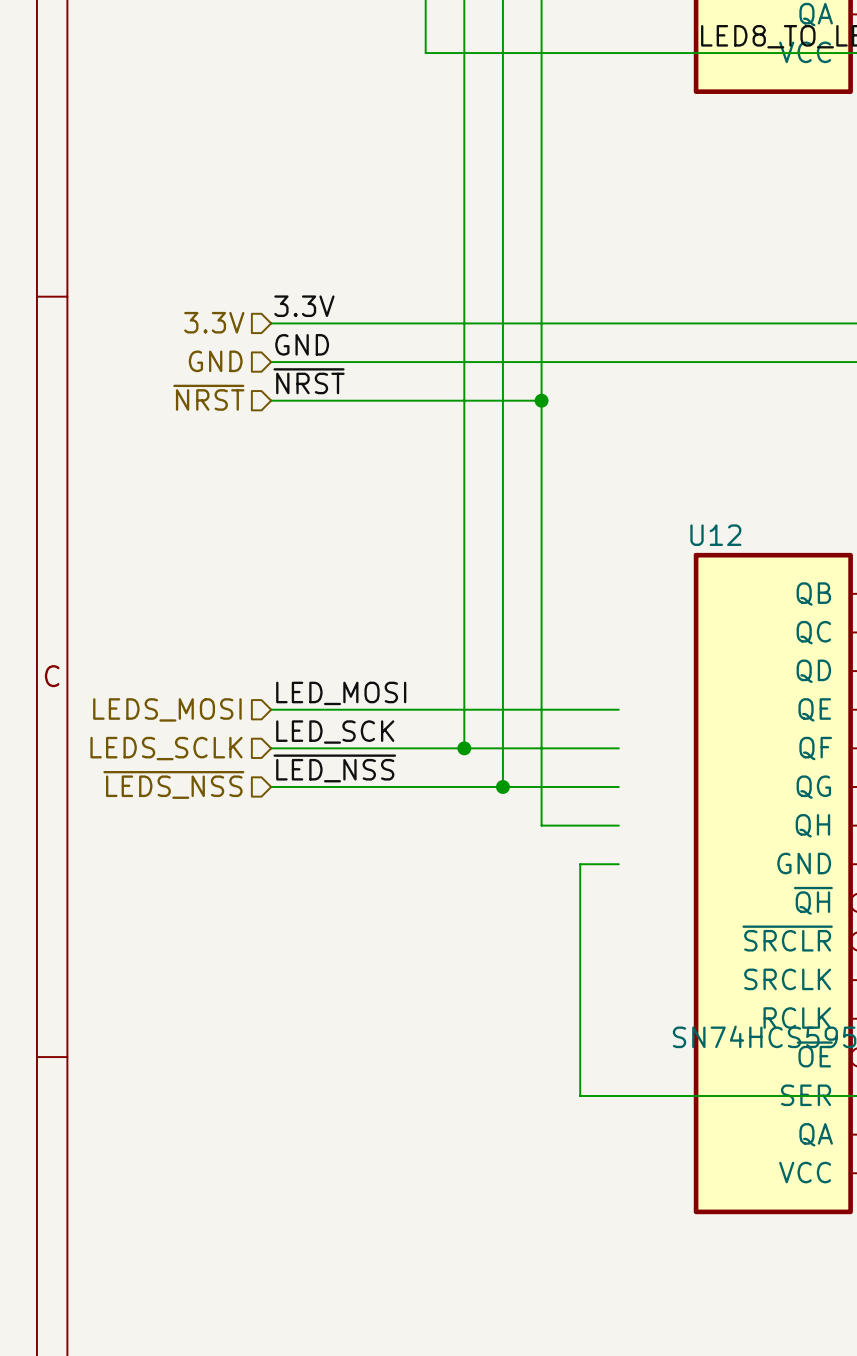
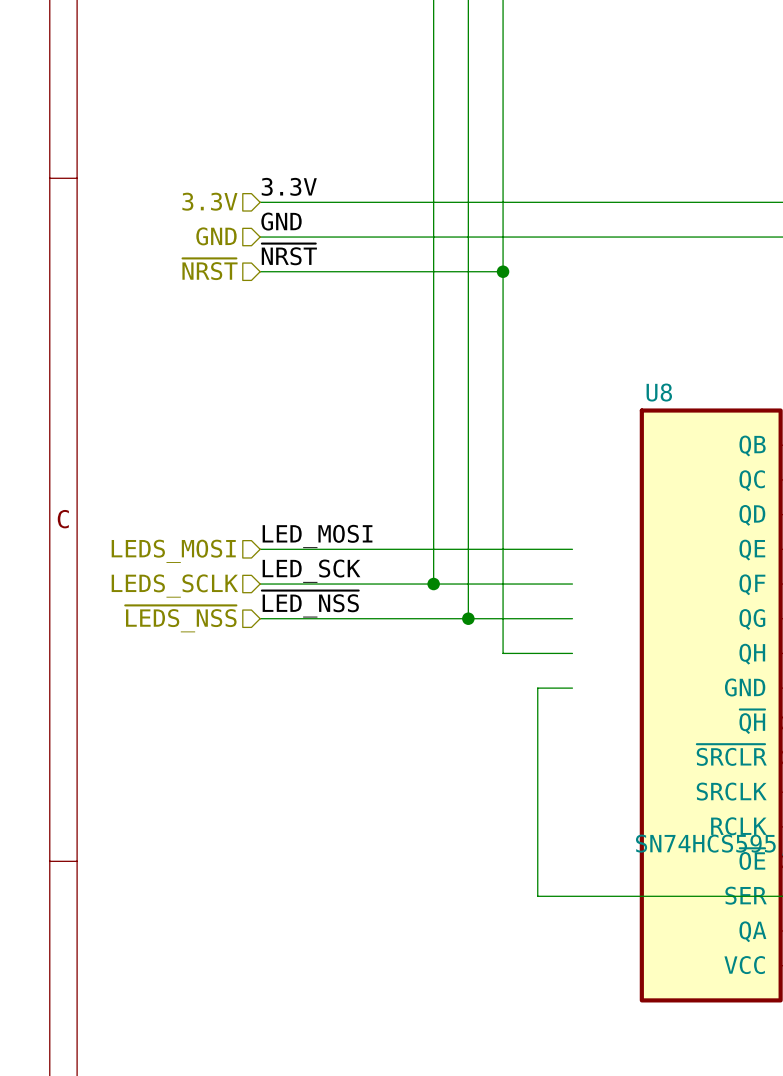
U12 name: U12 (715, 535) -> U8 (659, 392)

